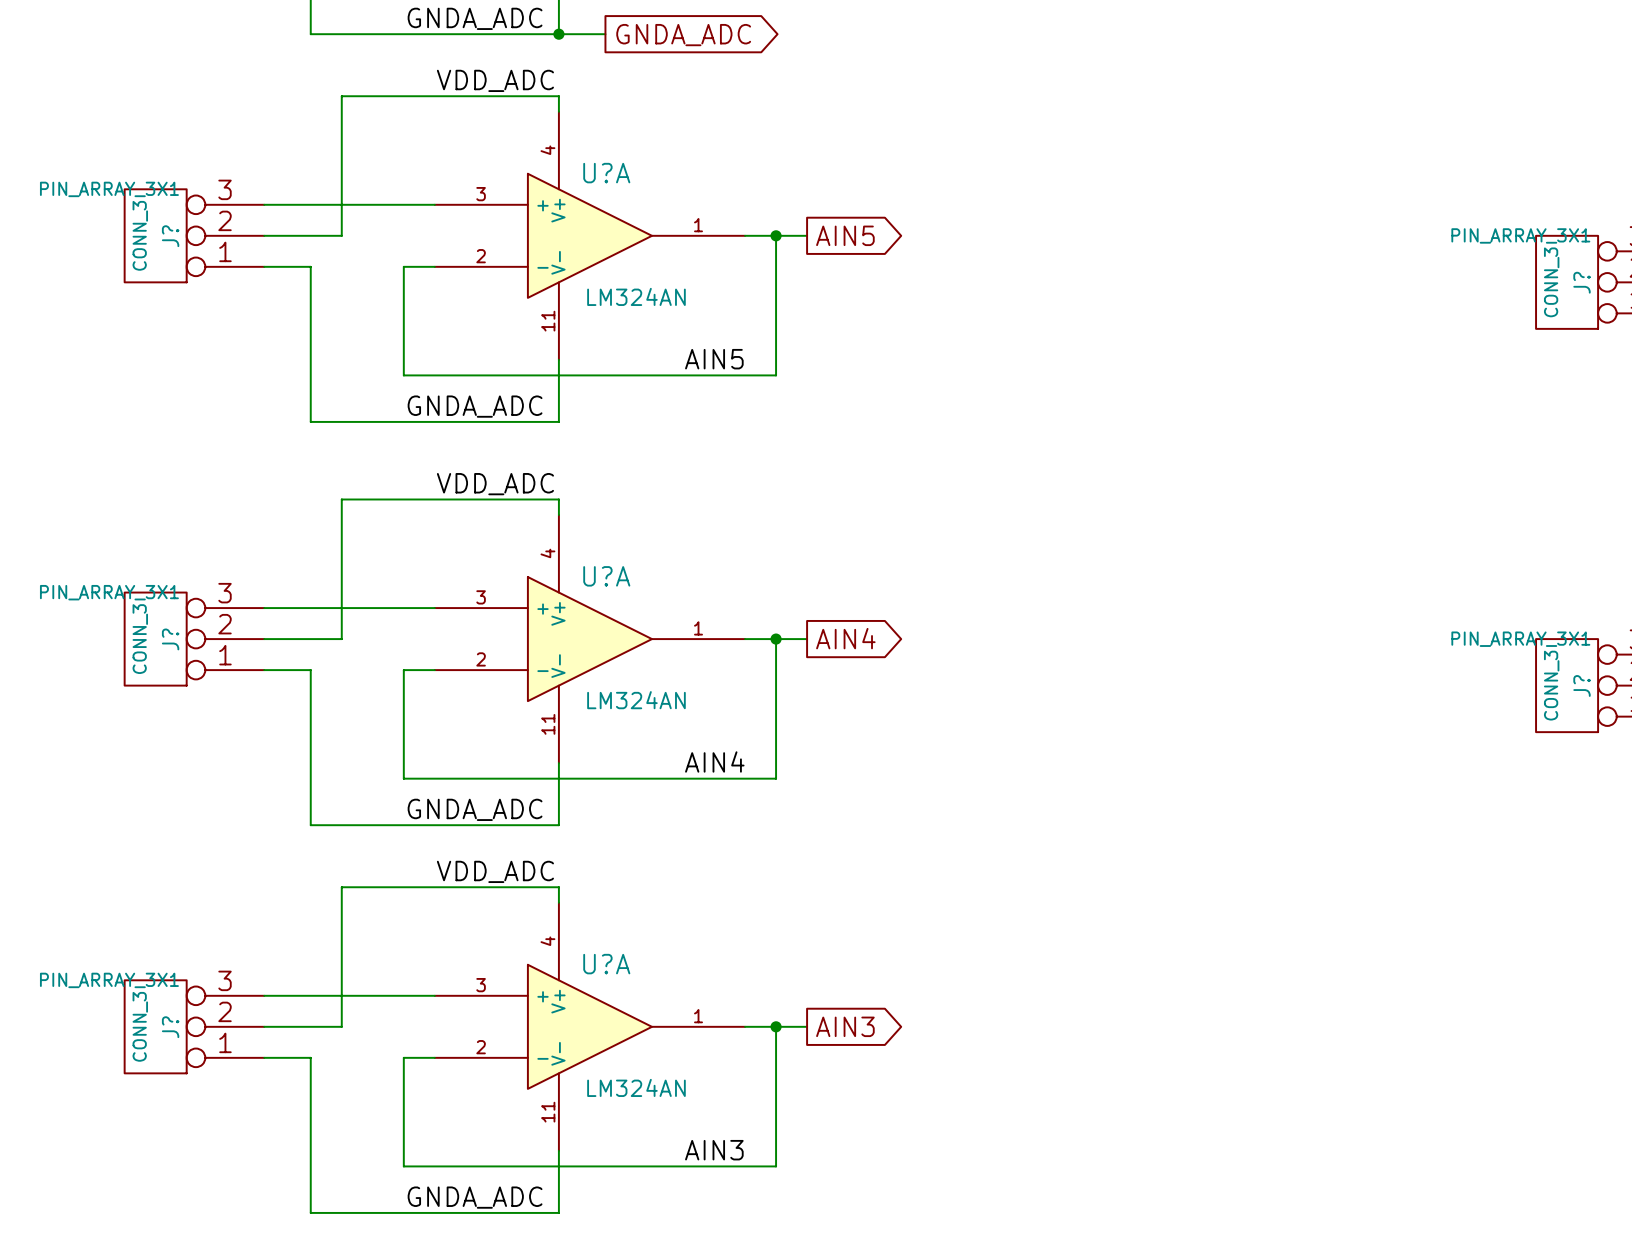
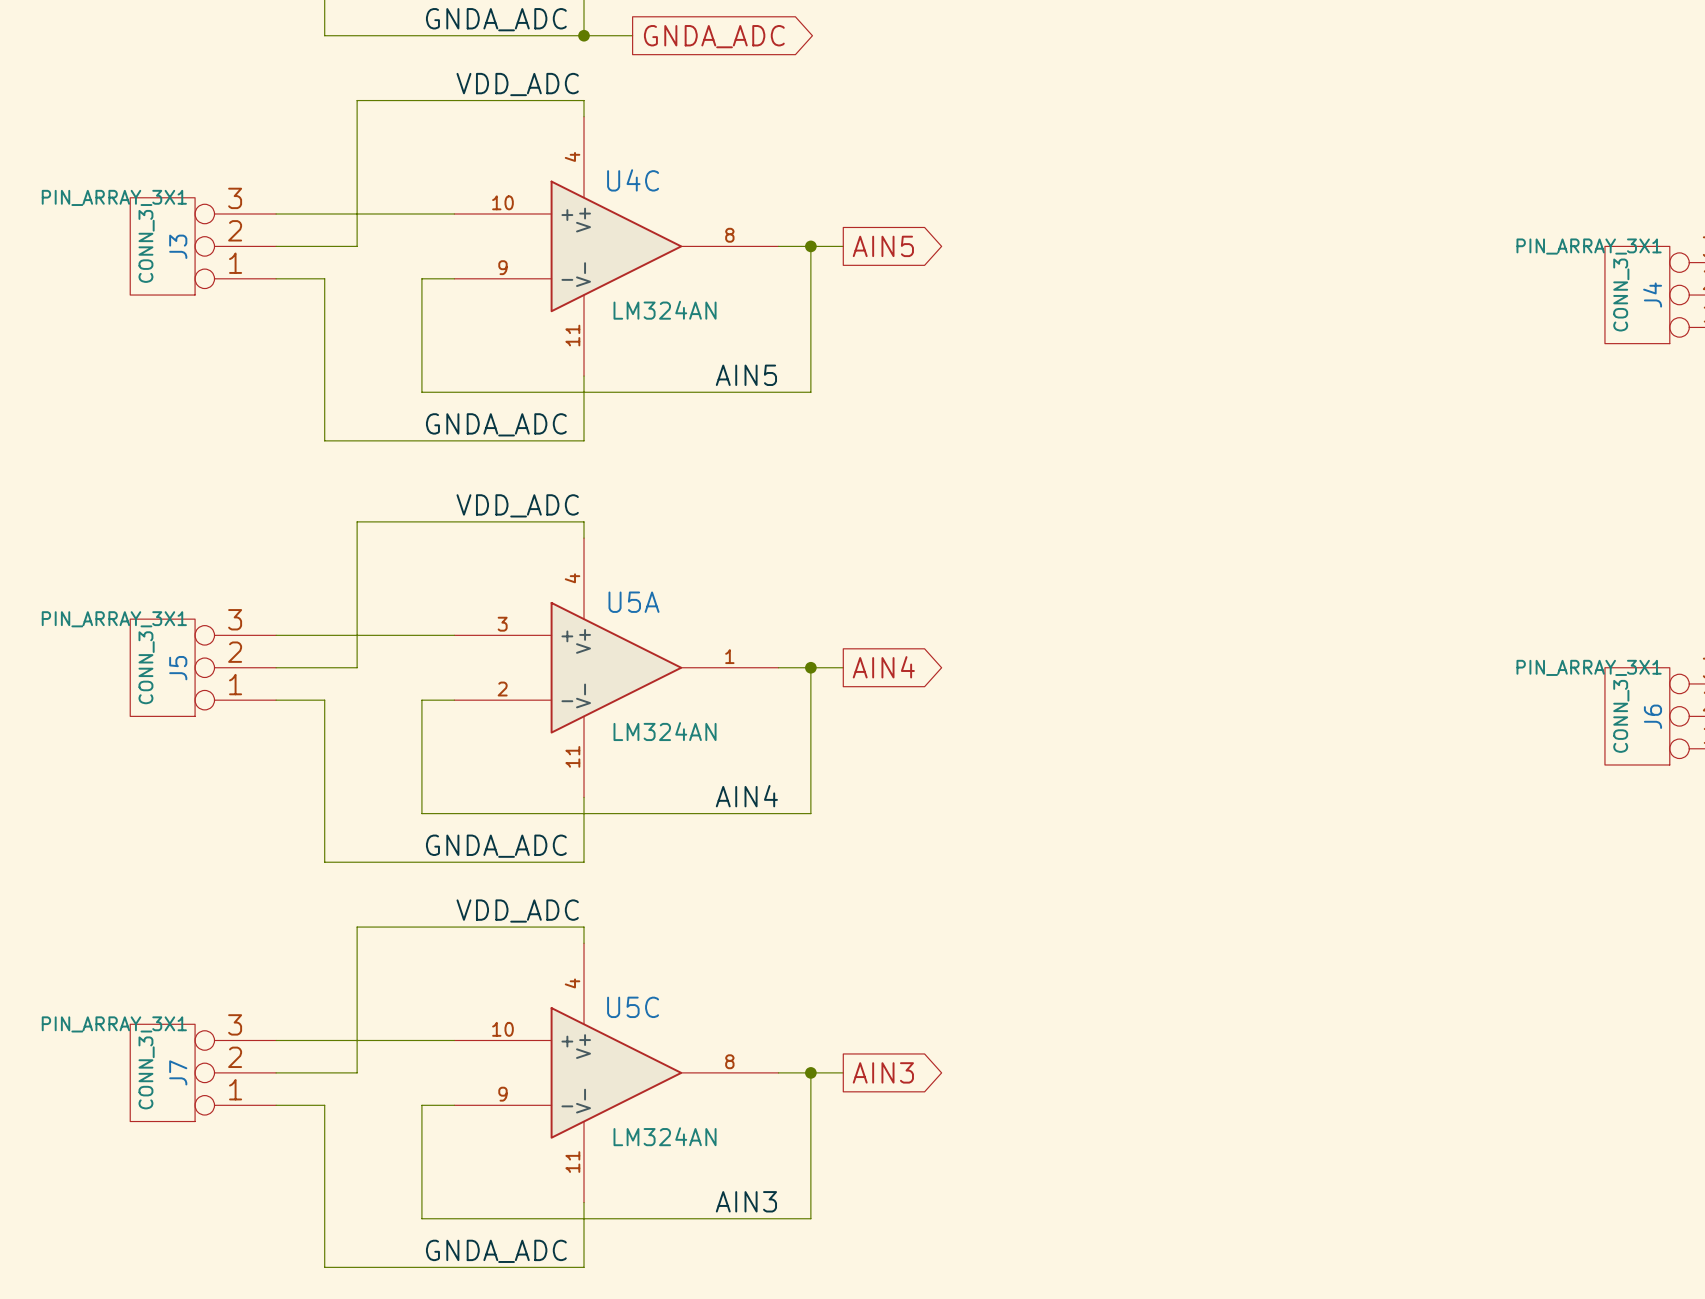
U?A name: U?A (606, 173) -> U4C (633, 180)
U?A pin number: 3 (481, 194) -> 10 (502, 202)
U?A pin number: 1 (698, 225) -> 8 (729, 235)
J? name: J? (170, 236) -> J3 (178, 246)
U?A pin number: 2 (481, 256) -> 9 (502, 267)
J? name: J? (1582, 282) -> J4 (1652, 295)
U?A name: U?A (606, 576) -> U5A (634, 602)
J? name: J? (170, 639) -> J5 (178, 668)
J? name: J? (1582, 685) -> J6 (1652, 716)
U?A name: U?A (606, 964) -> U5C (633, 1007)
U?A pin number: 3 (481, 985) -> 10 (502, 1029)
U?A pin number: 1 (698, 1016) -> 8 (729, 1061)
J? name: J? (170, 1027) -> J7 (178, 1072)
U?A pin number: 2 (481, 1047) -> 9 (502, 1094)

